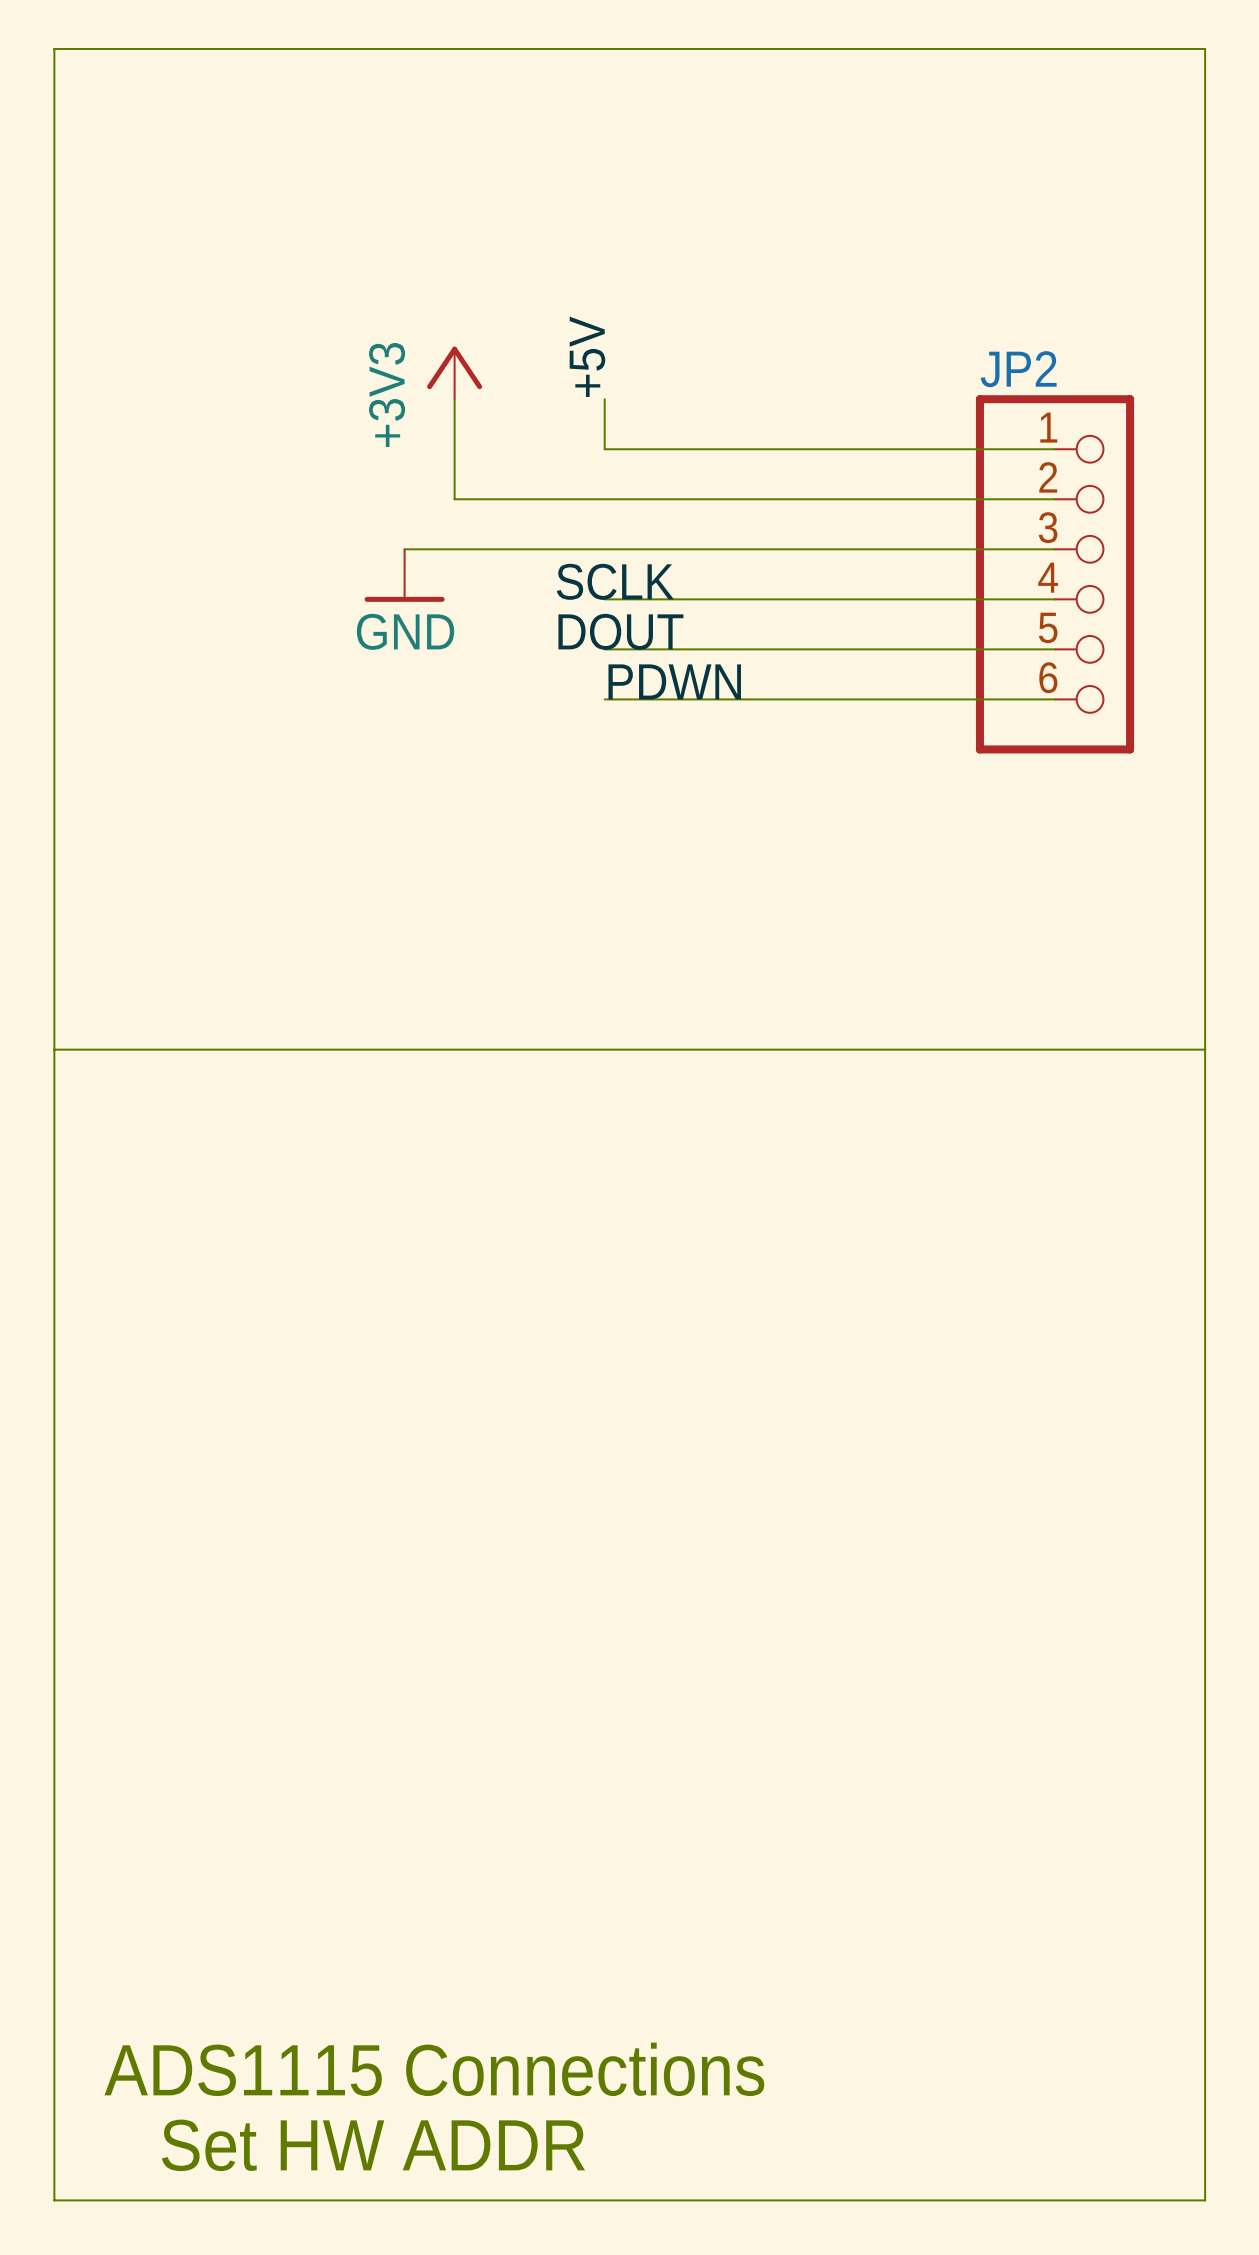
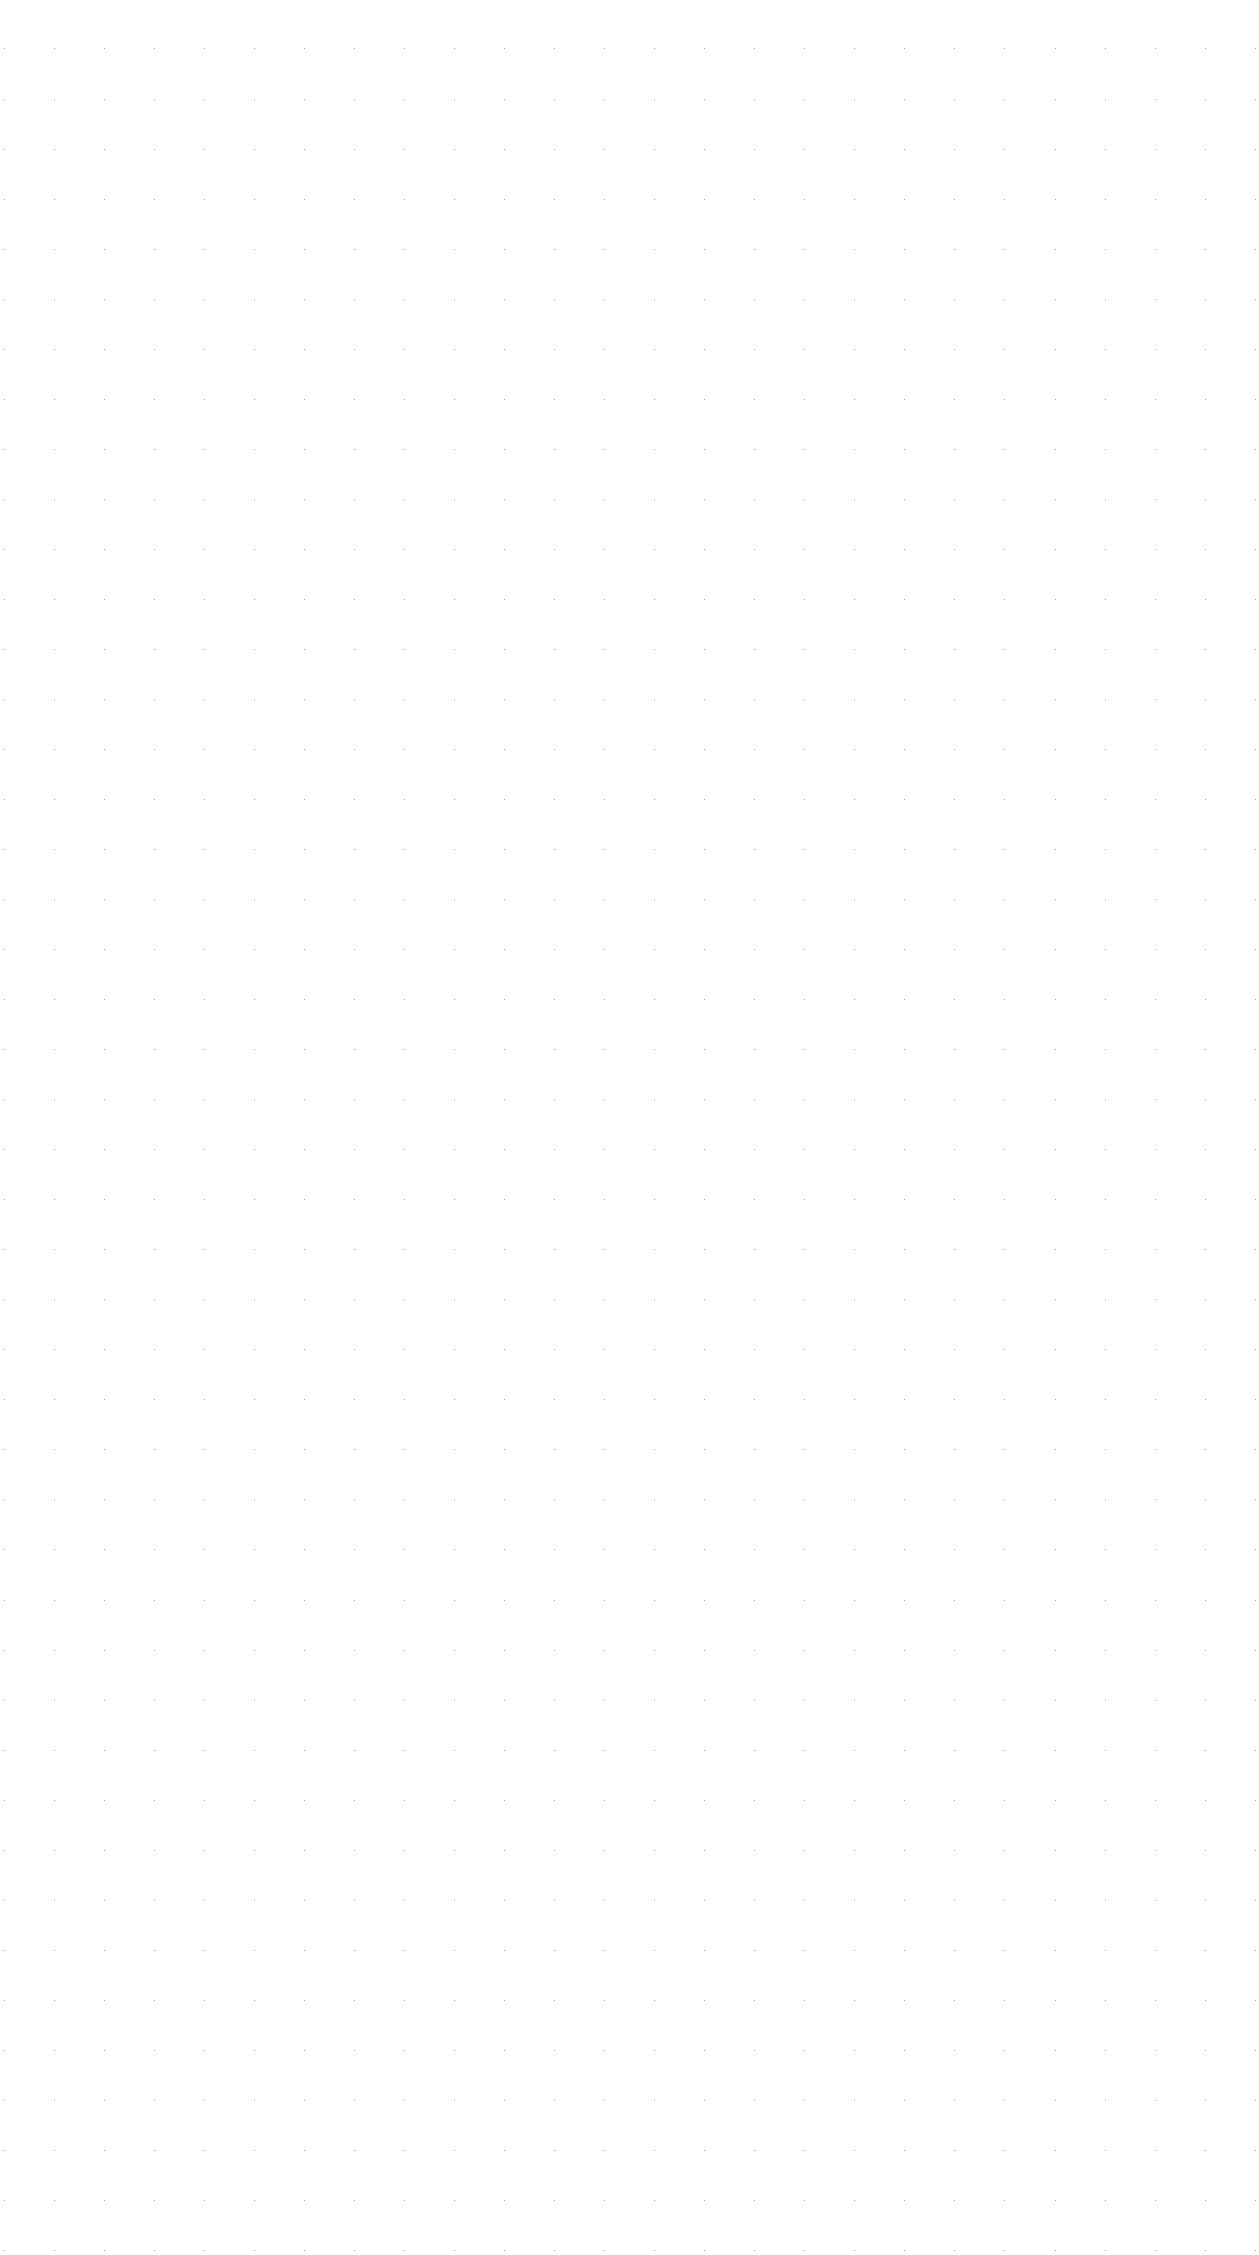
wire: (54, 48) (54, 2200) (1205, 2200) (1205, 48) (54, 48) -> none
label: +5V (587, 356) -> none
power symbol: +3V3 (454, 372) -> none
wire: (454, 399) (454, 499) (1055, 499) -> none
wire: (604, 399) (604, 449) (1055, 449) -> none
wire: (404, 549) (1055, 549) -> none
JP2: (1055, 574) -> none
power symbol: GND (404, 575) -> none
label: SCLK (615, 581) -> none
wire: (604, 599) (1055, 599) -> none
label: DOUT (620, 631) -> none
wire: (604, 649) (1055, 649) -> none
label: PDWN (674, 681) -> none
wire: (604, 699) (1055, 699) -> none
wire: (54, 1049) (1205, 1049) -> none
text: ADS1115 Connections (434, 2069) -> none
text: Set HW ADDR (373, 2145) -> none

